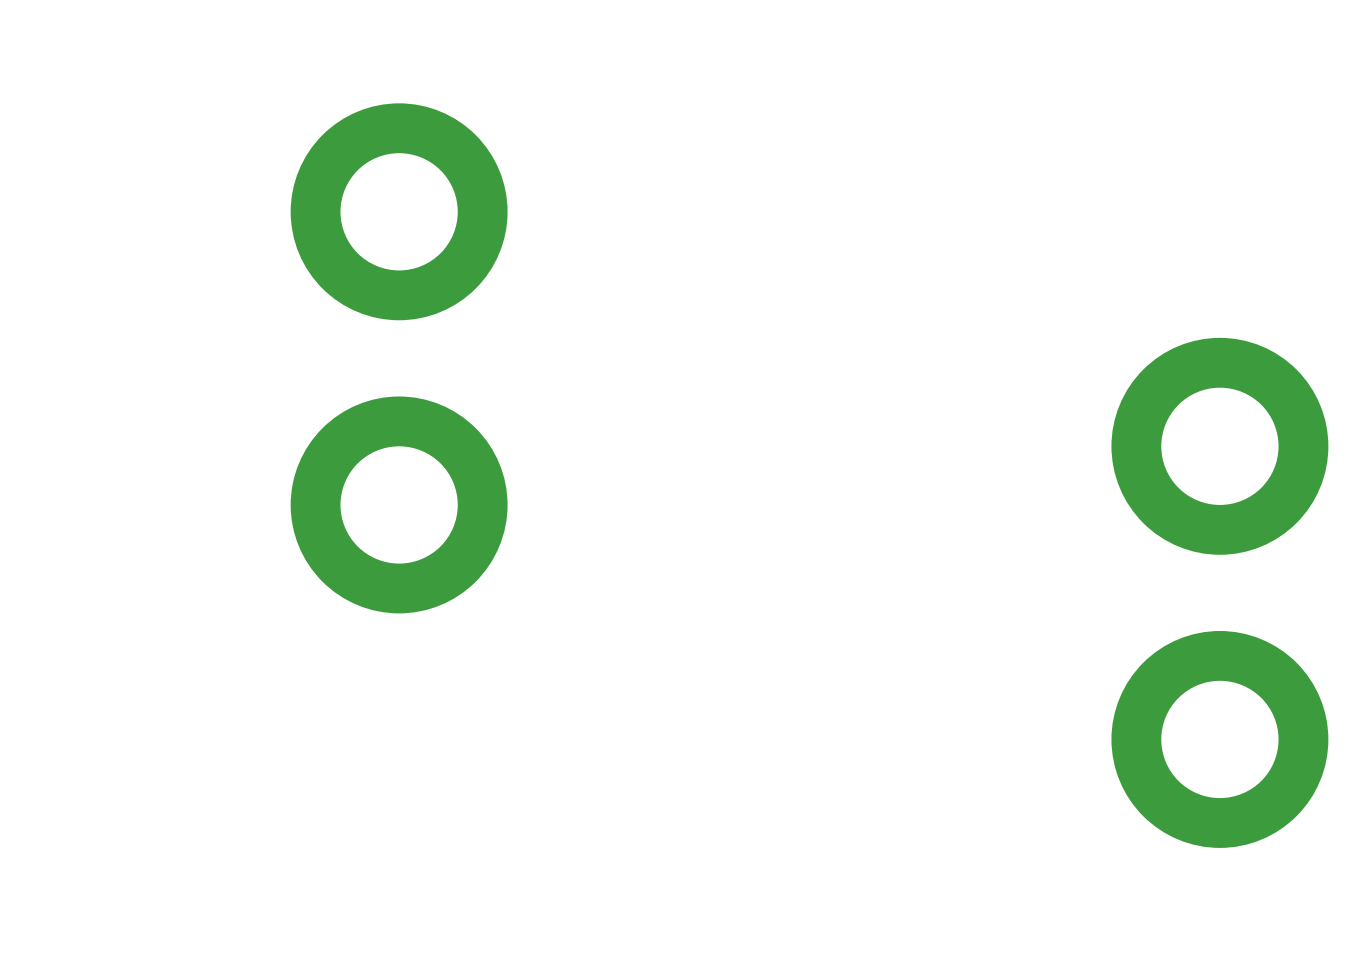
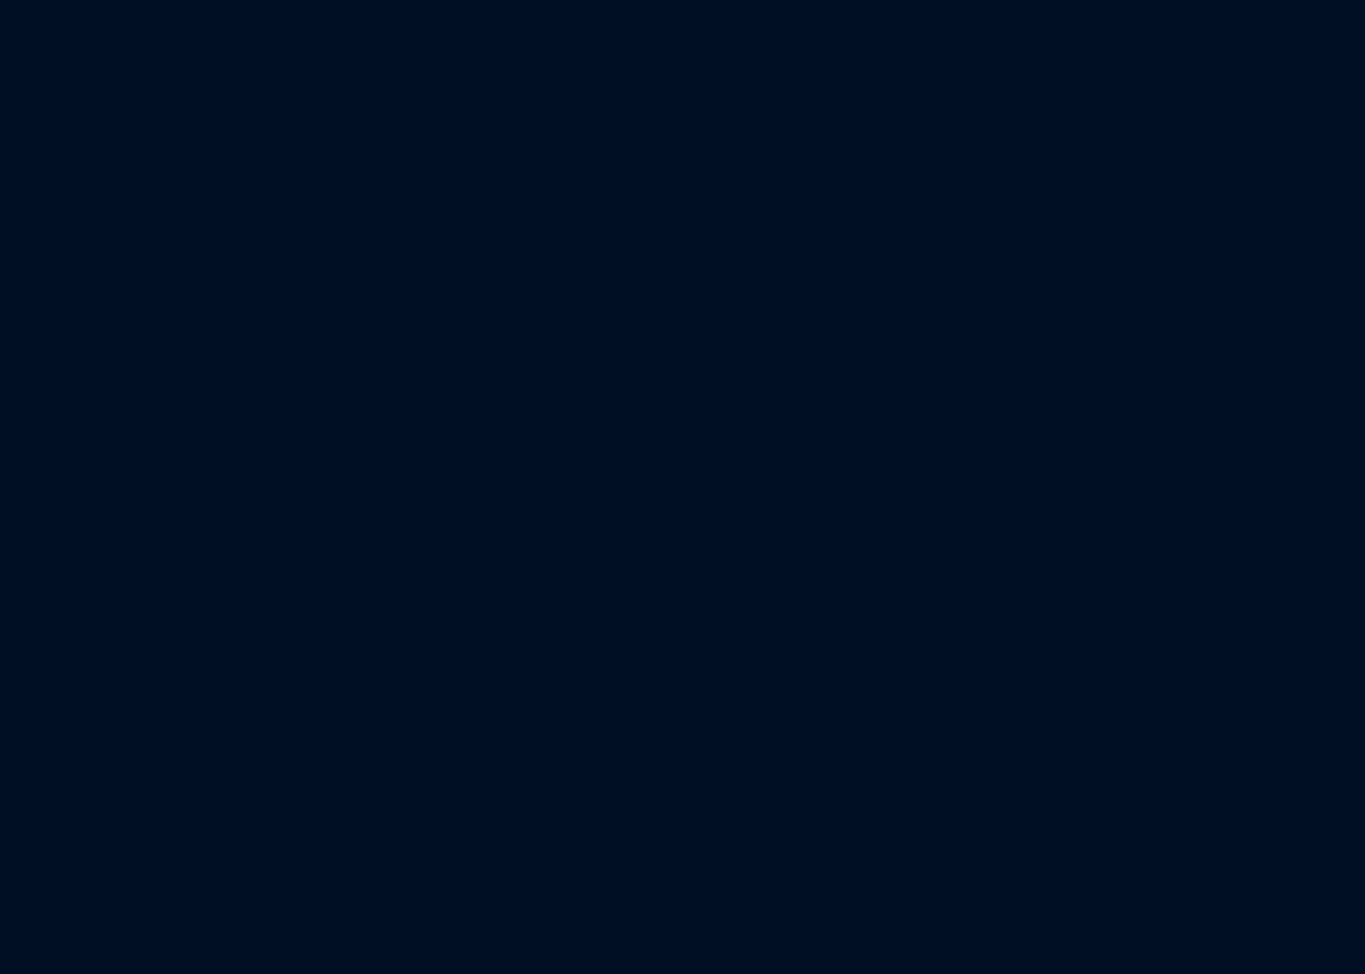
part: (399, 358) -> none
part: (1219, 592) -> none

